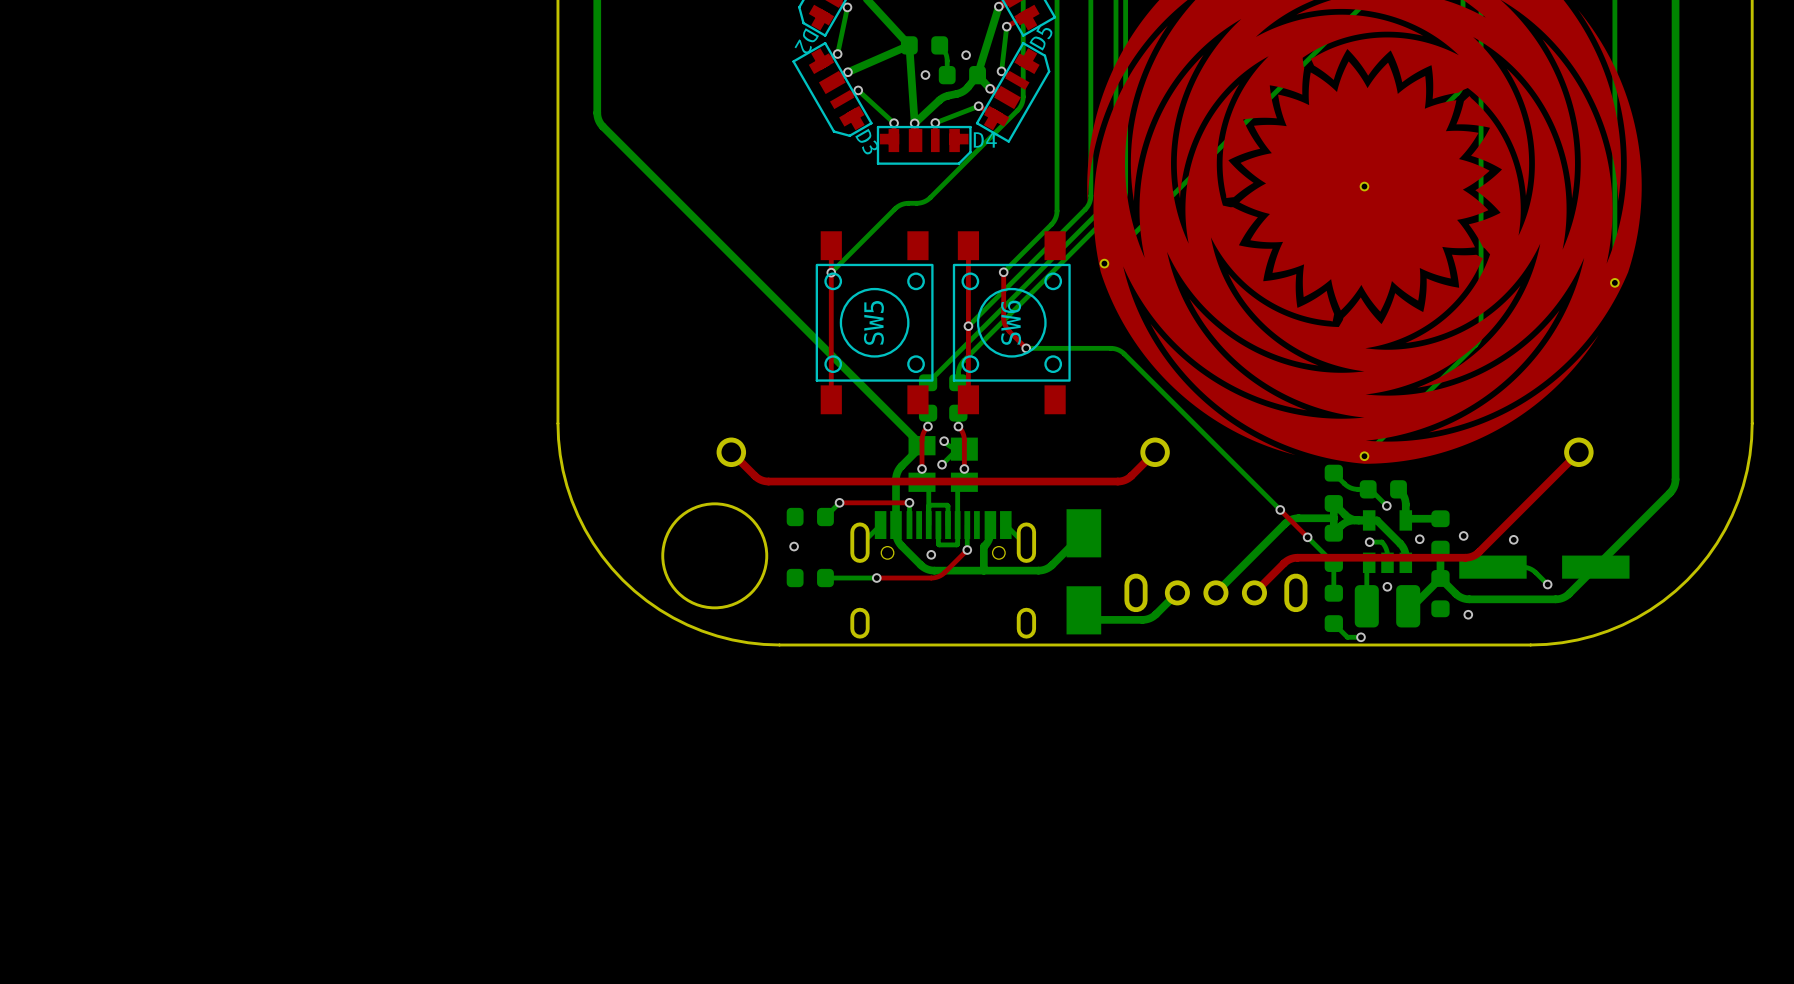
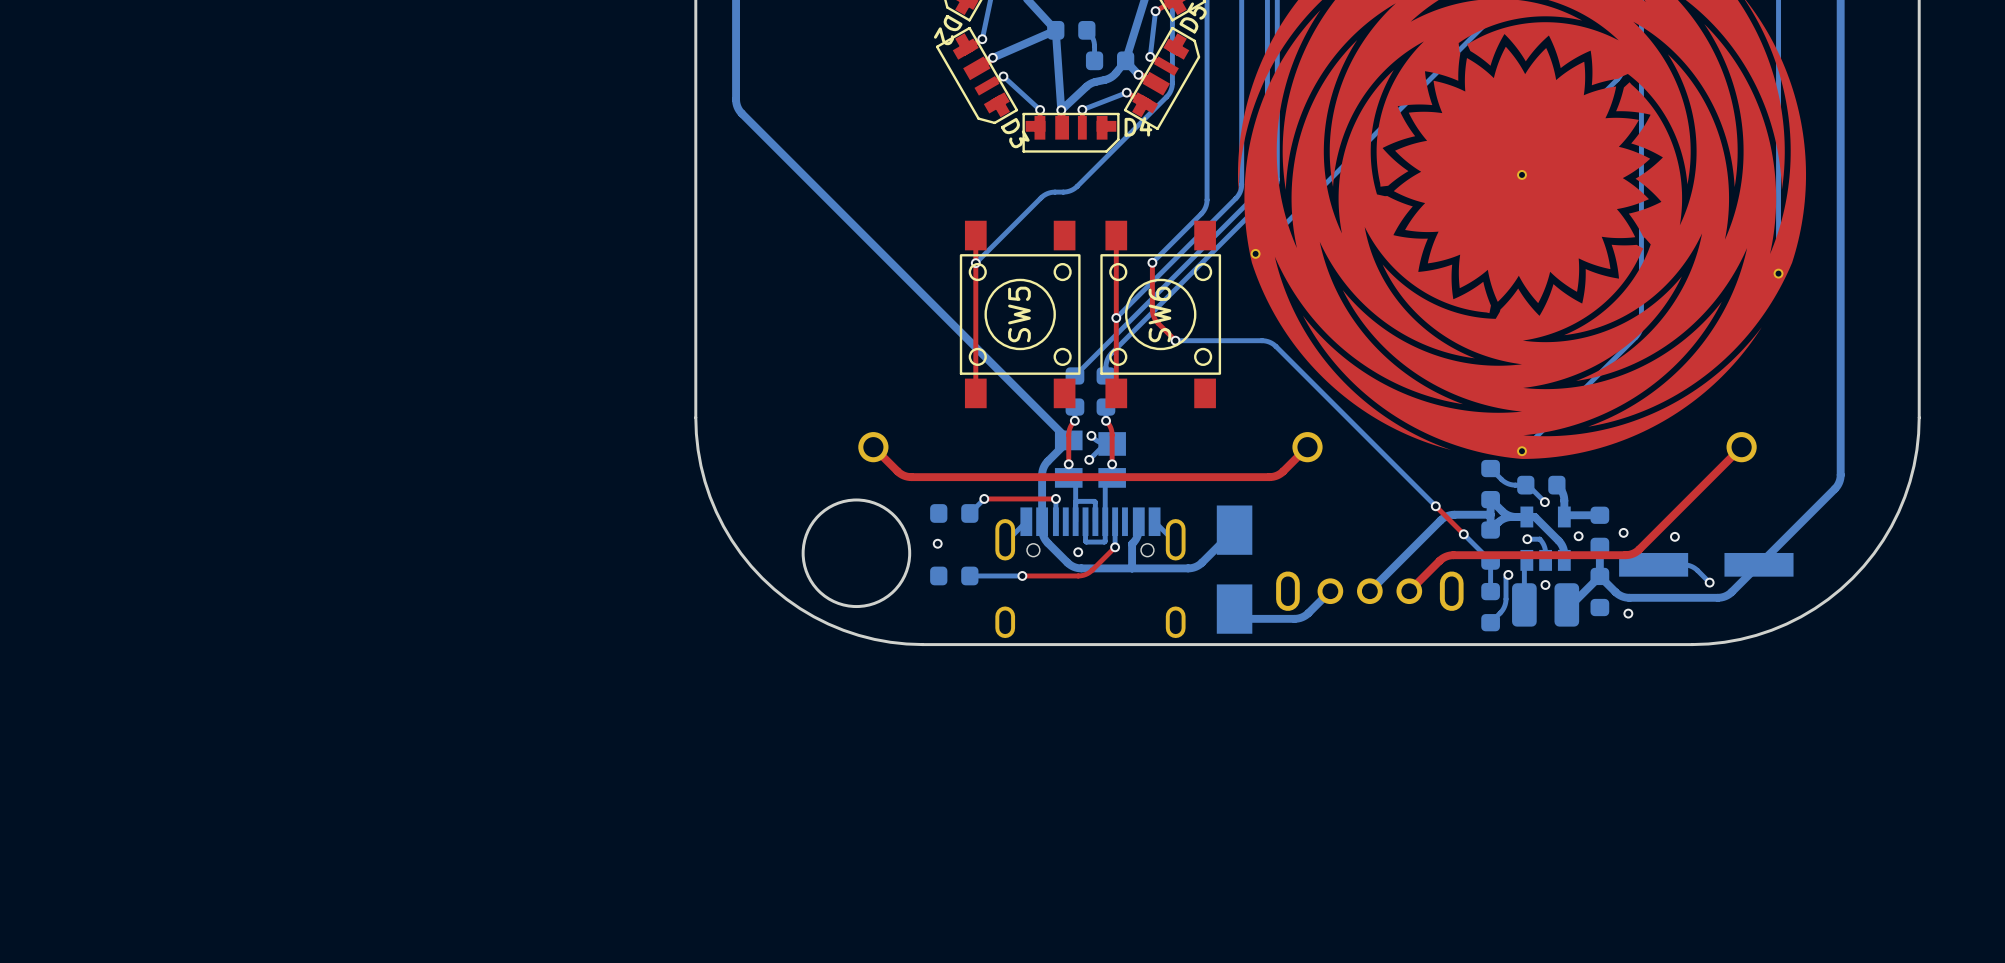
via: (966, 55) -> none
via: (925, 75) -> none
bottom track: (1333, 623) (1347, 637) (1361, 637) -> (1490, 622) (1504, 606) (1506, 577) (1508, 574)
via position: (1361, 637) -> (1508, 574)

